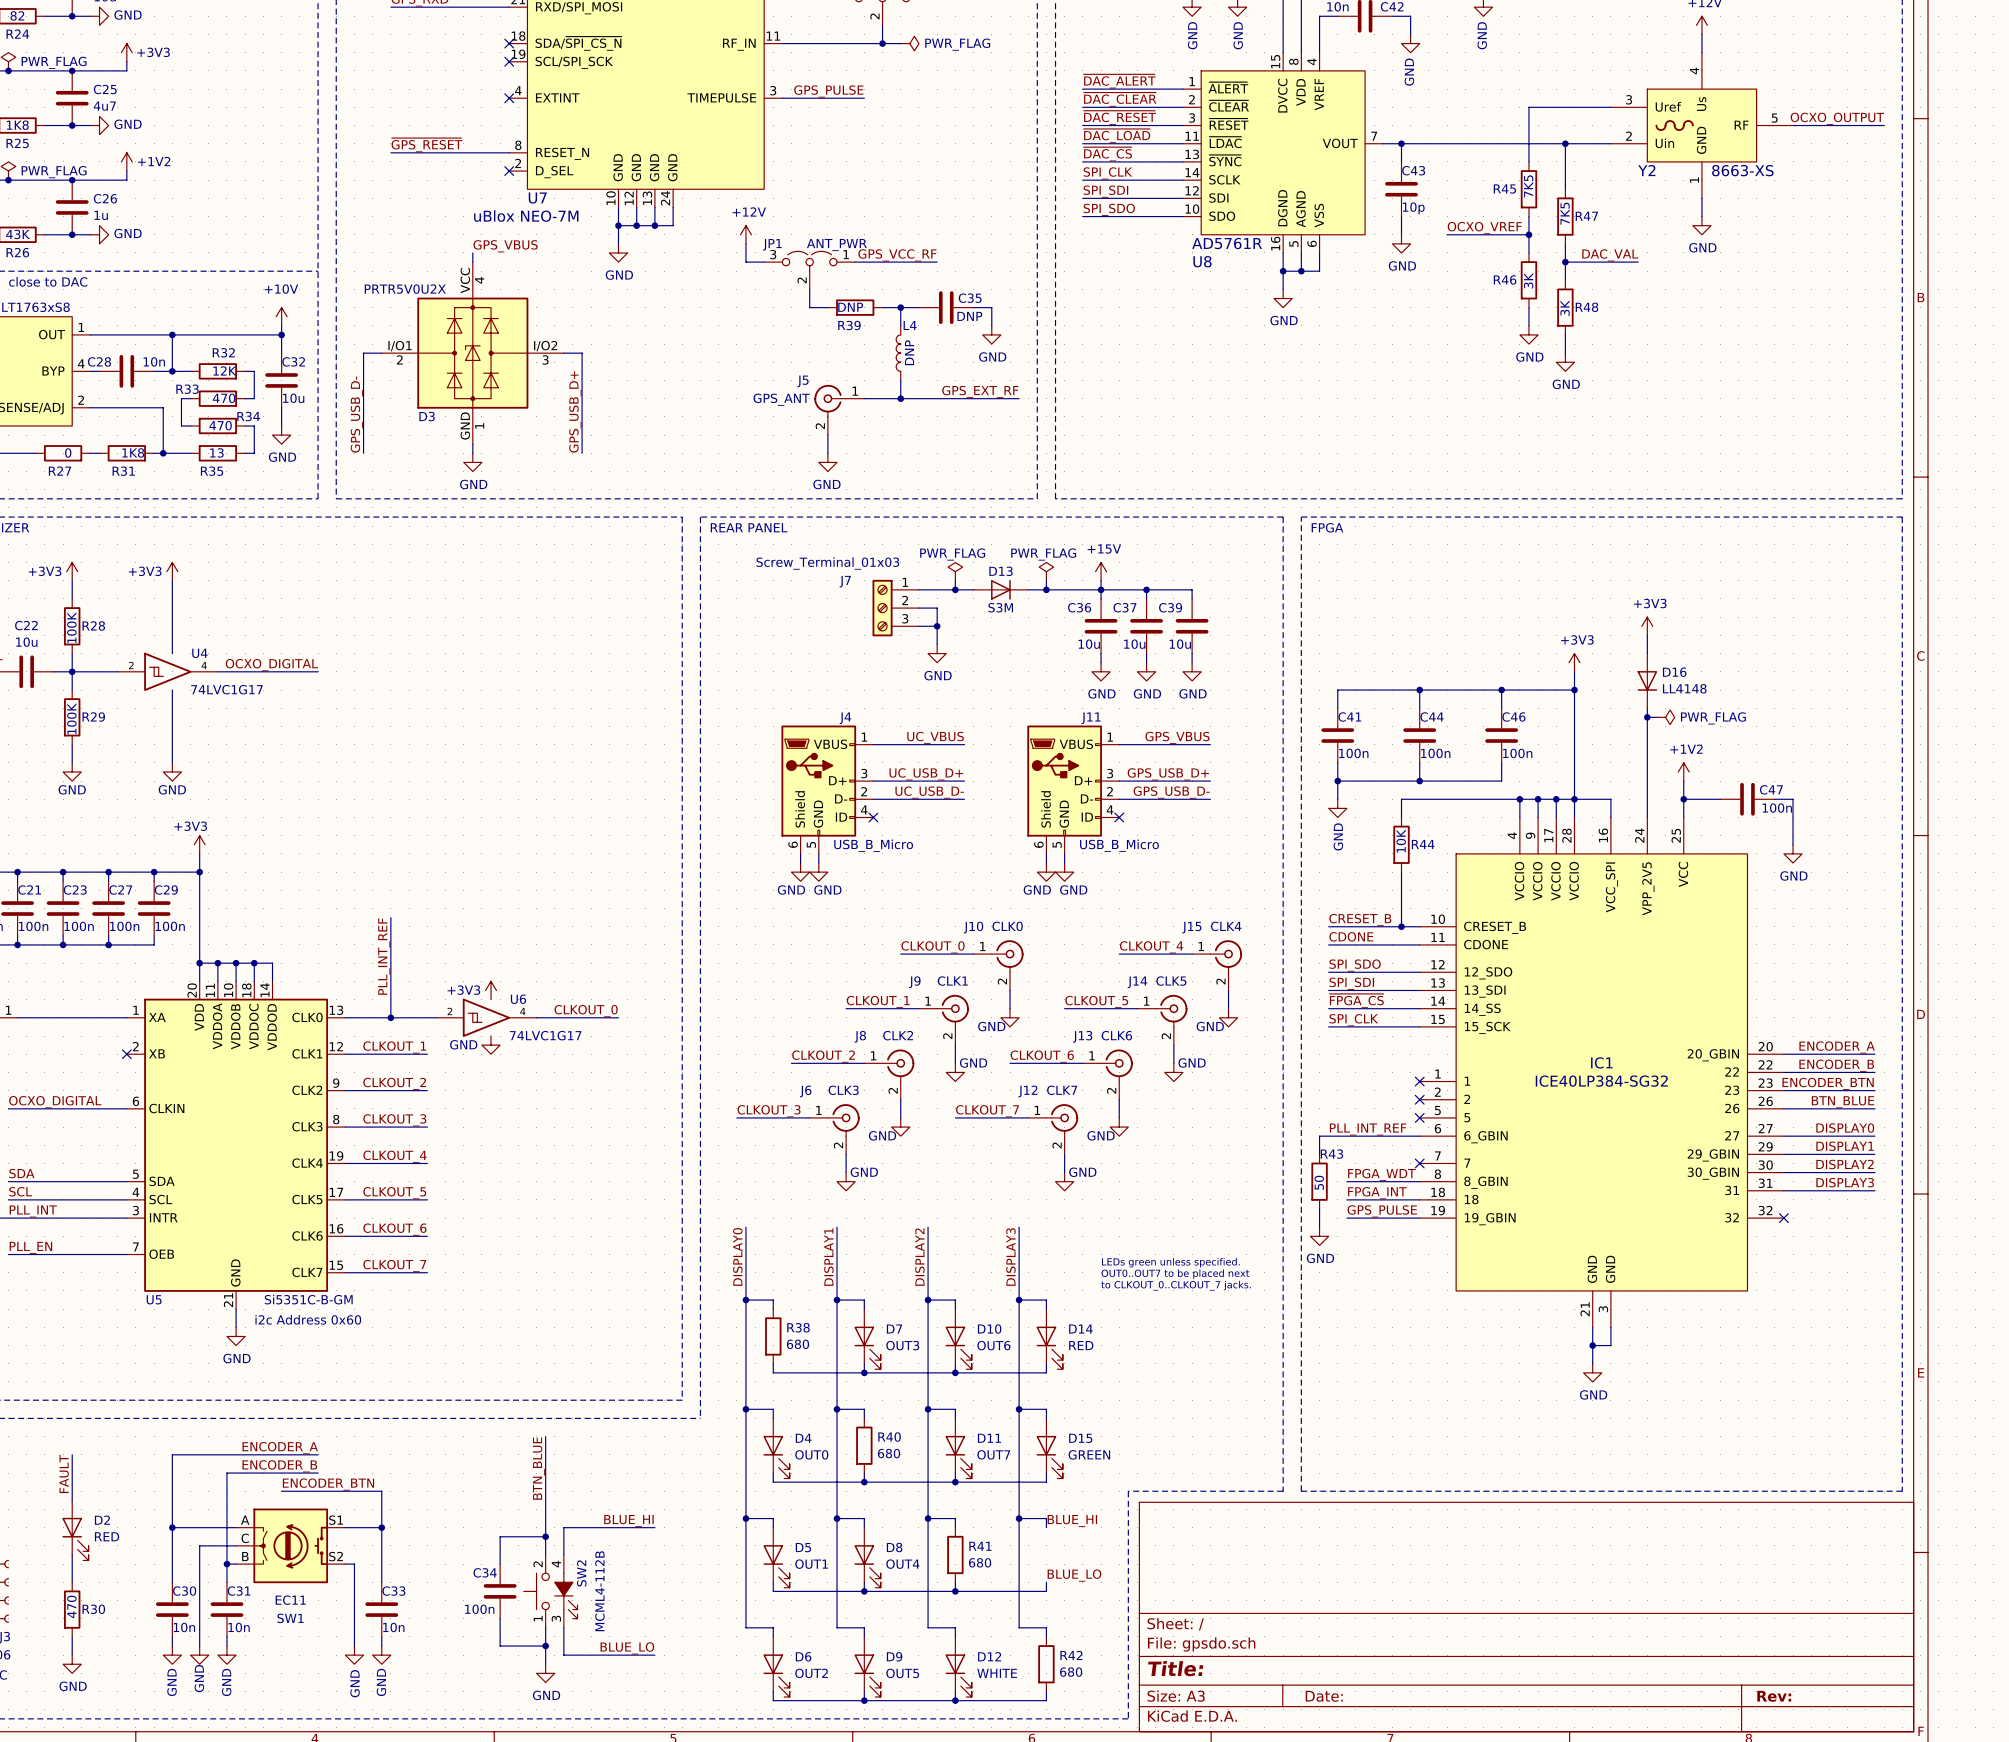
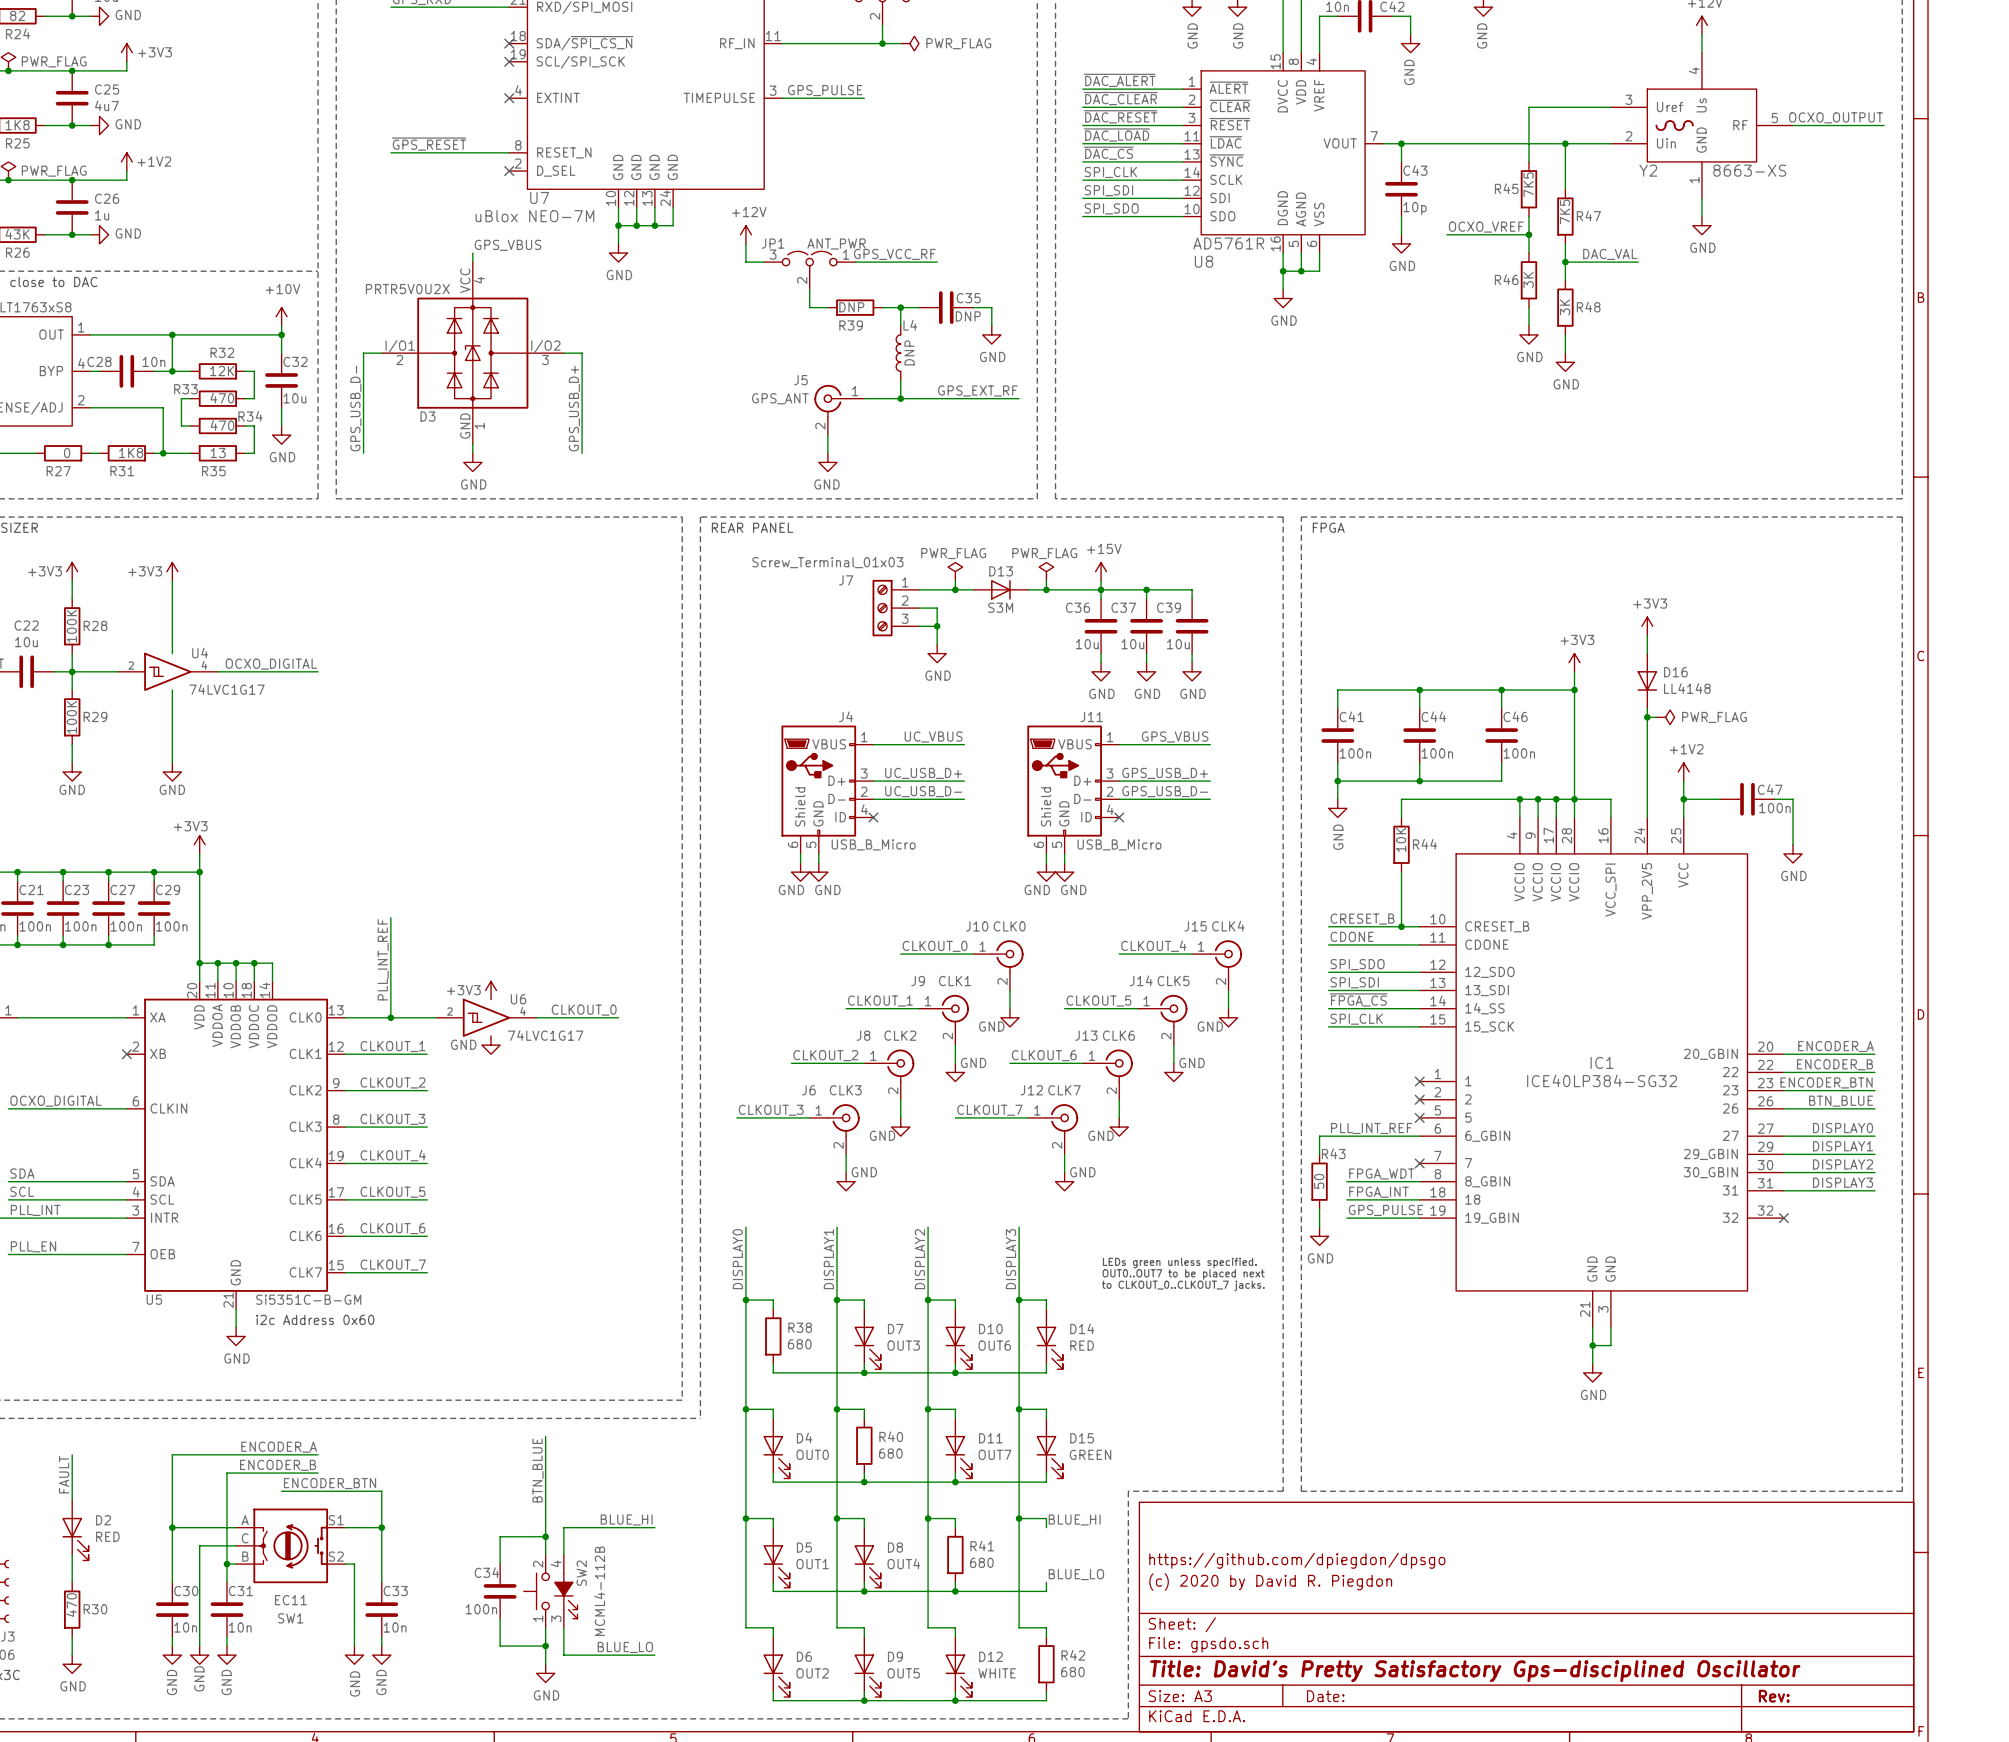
title block: none -> https://github.com/dpiegdon/dpsgo (1297, 1560)
title block: none -> (c) 2020 by David R. Piegdon (1270, 1582)
title block: Title: (1175, 1668) -> Title: David's Pretty Satisfactory Gps-disciplined Oscillator (1475, 1671)

